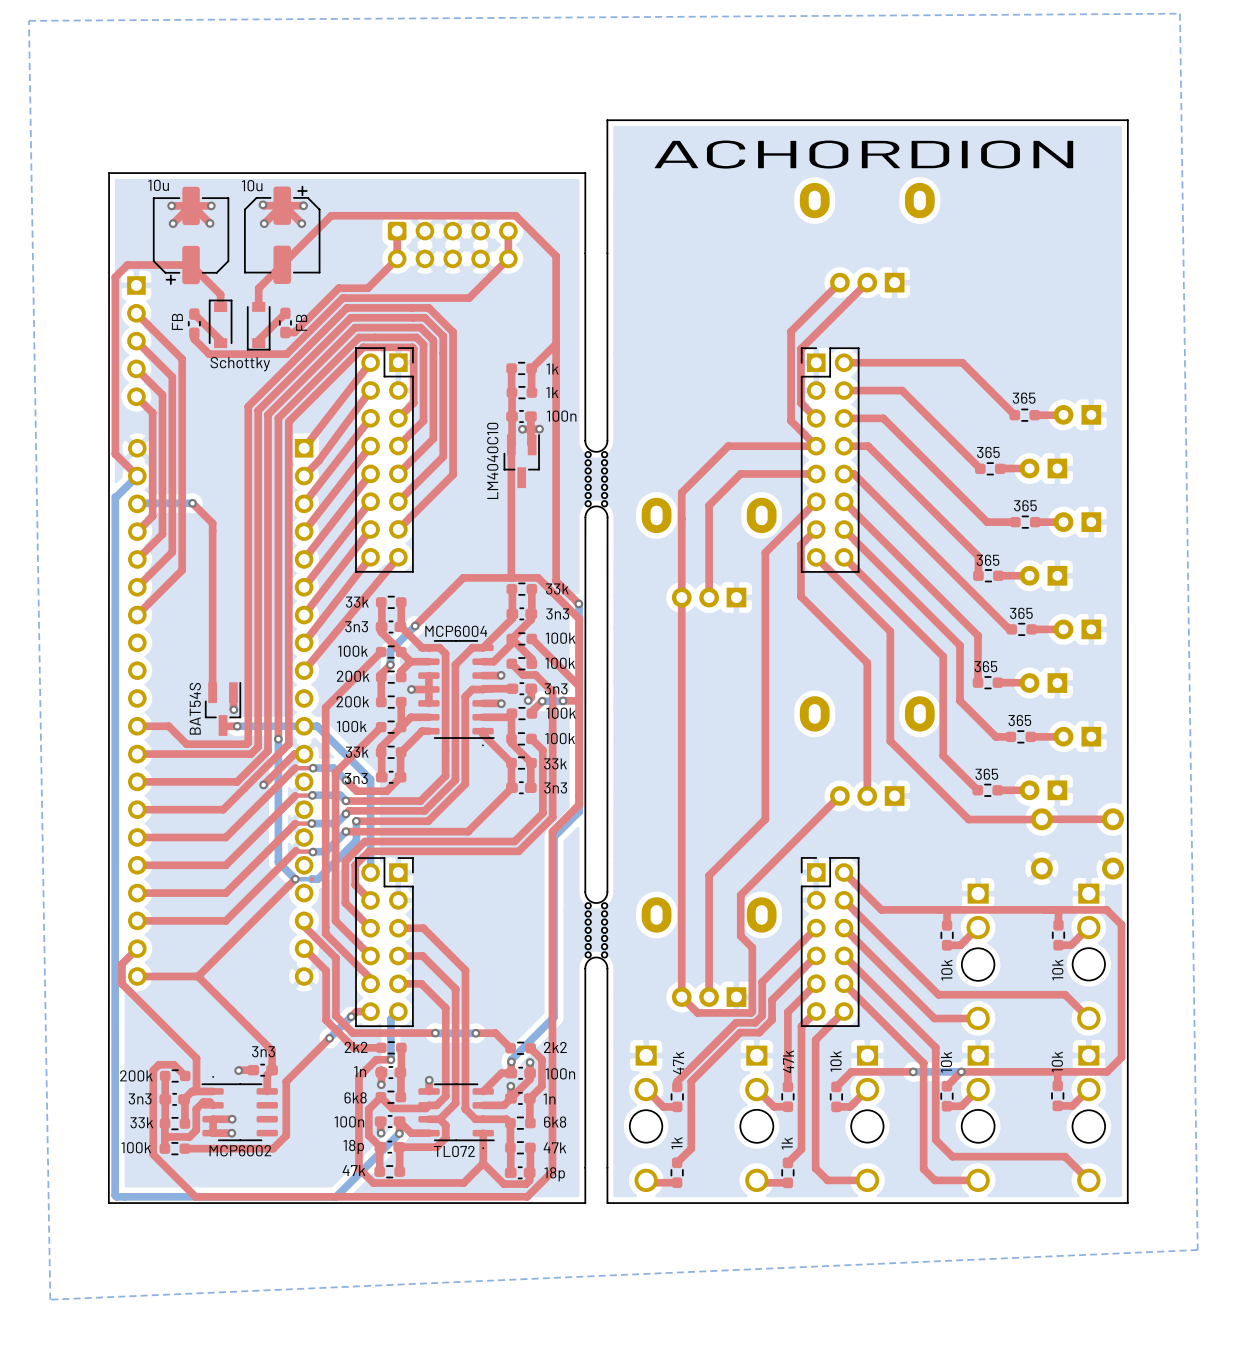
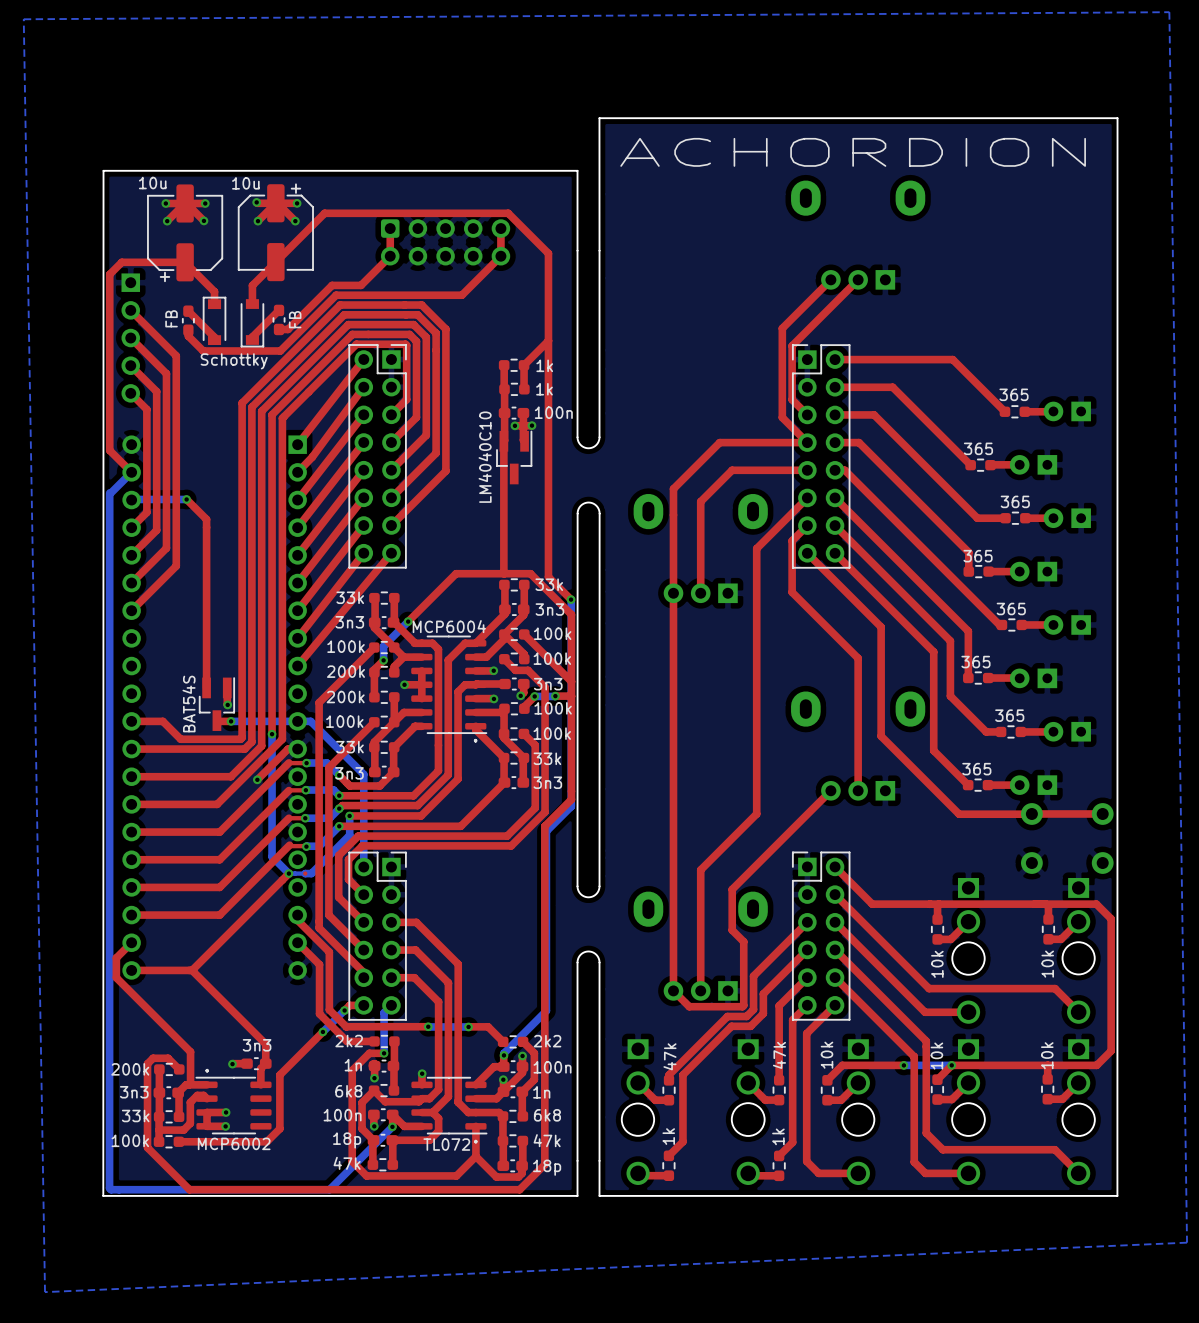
part: (596, 479) -> none
part: (596, 930) -> none

